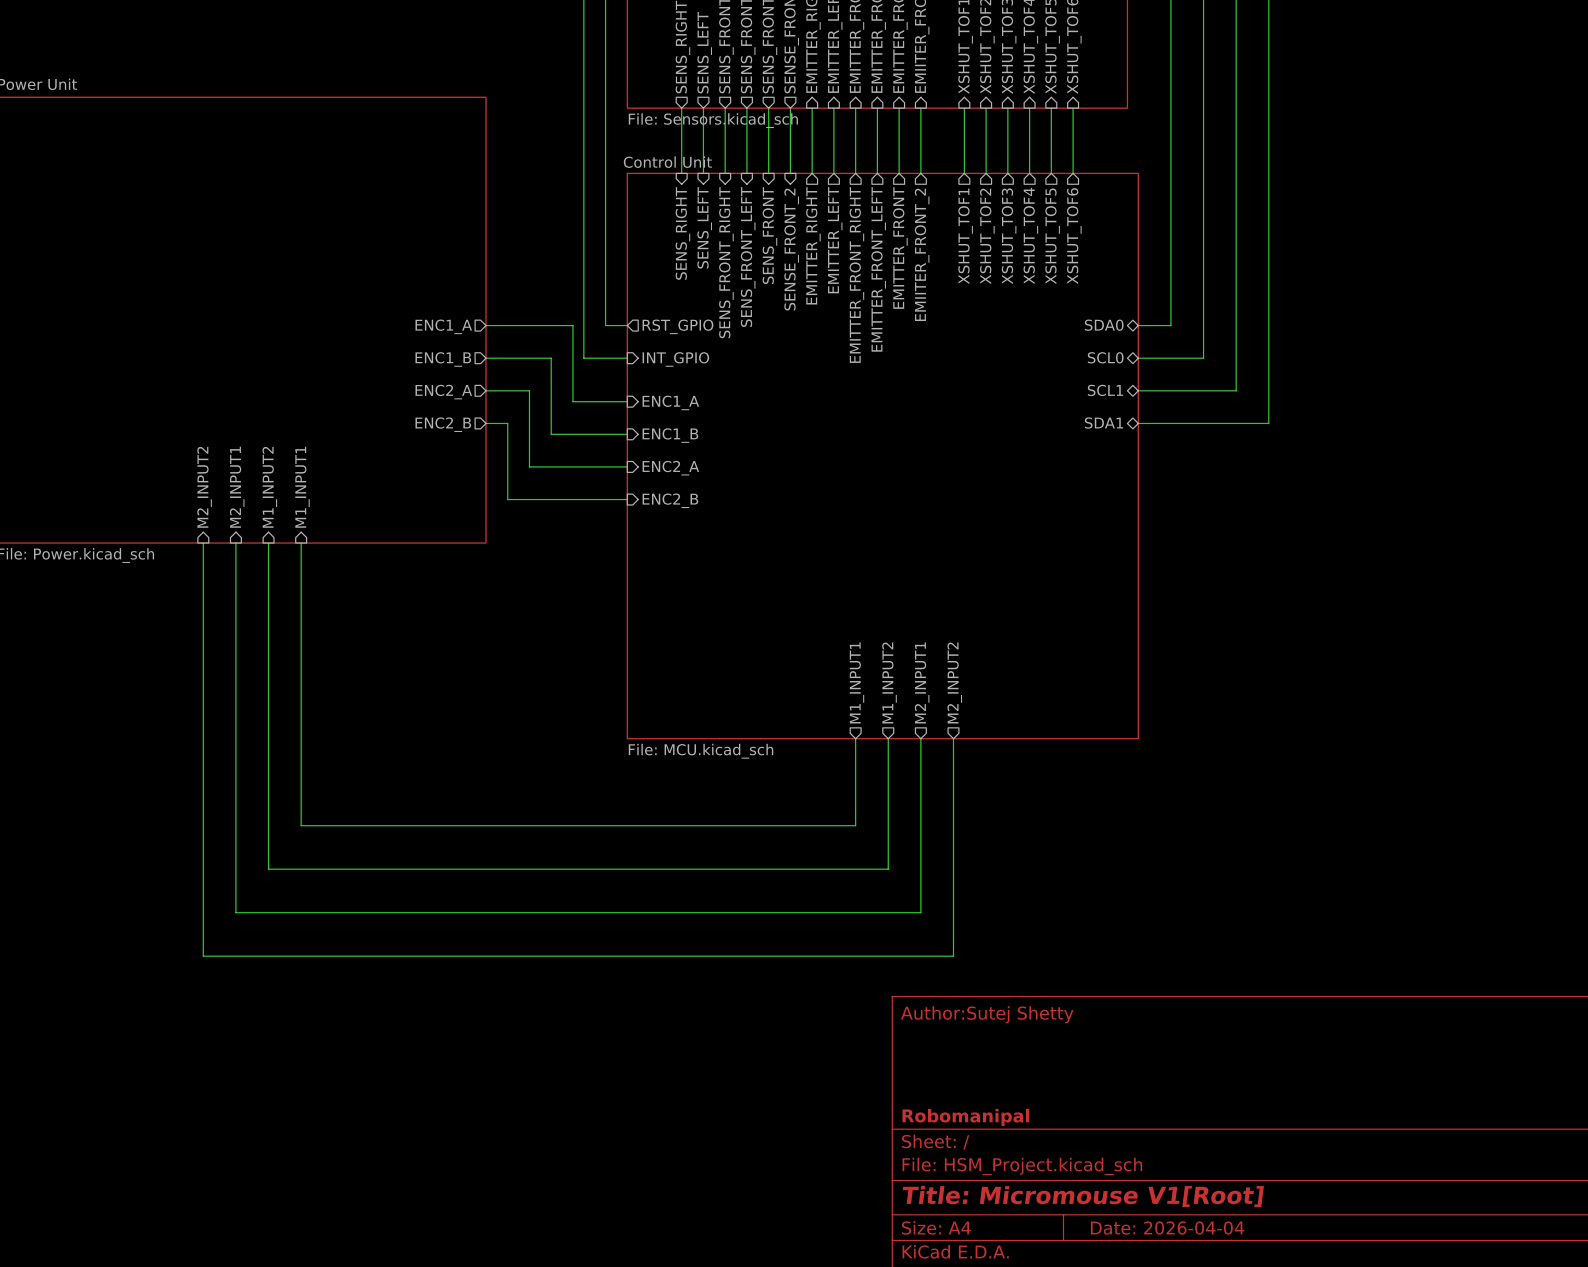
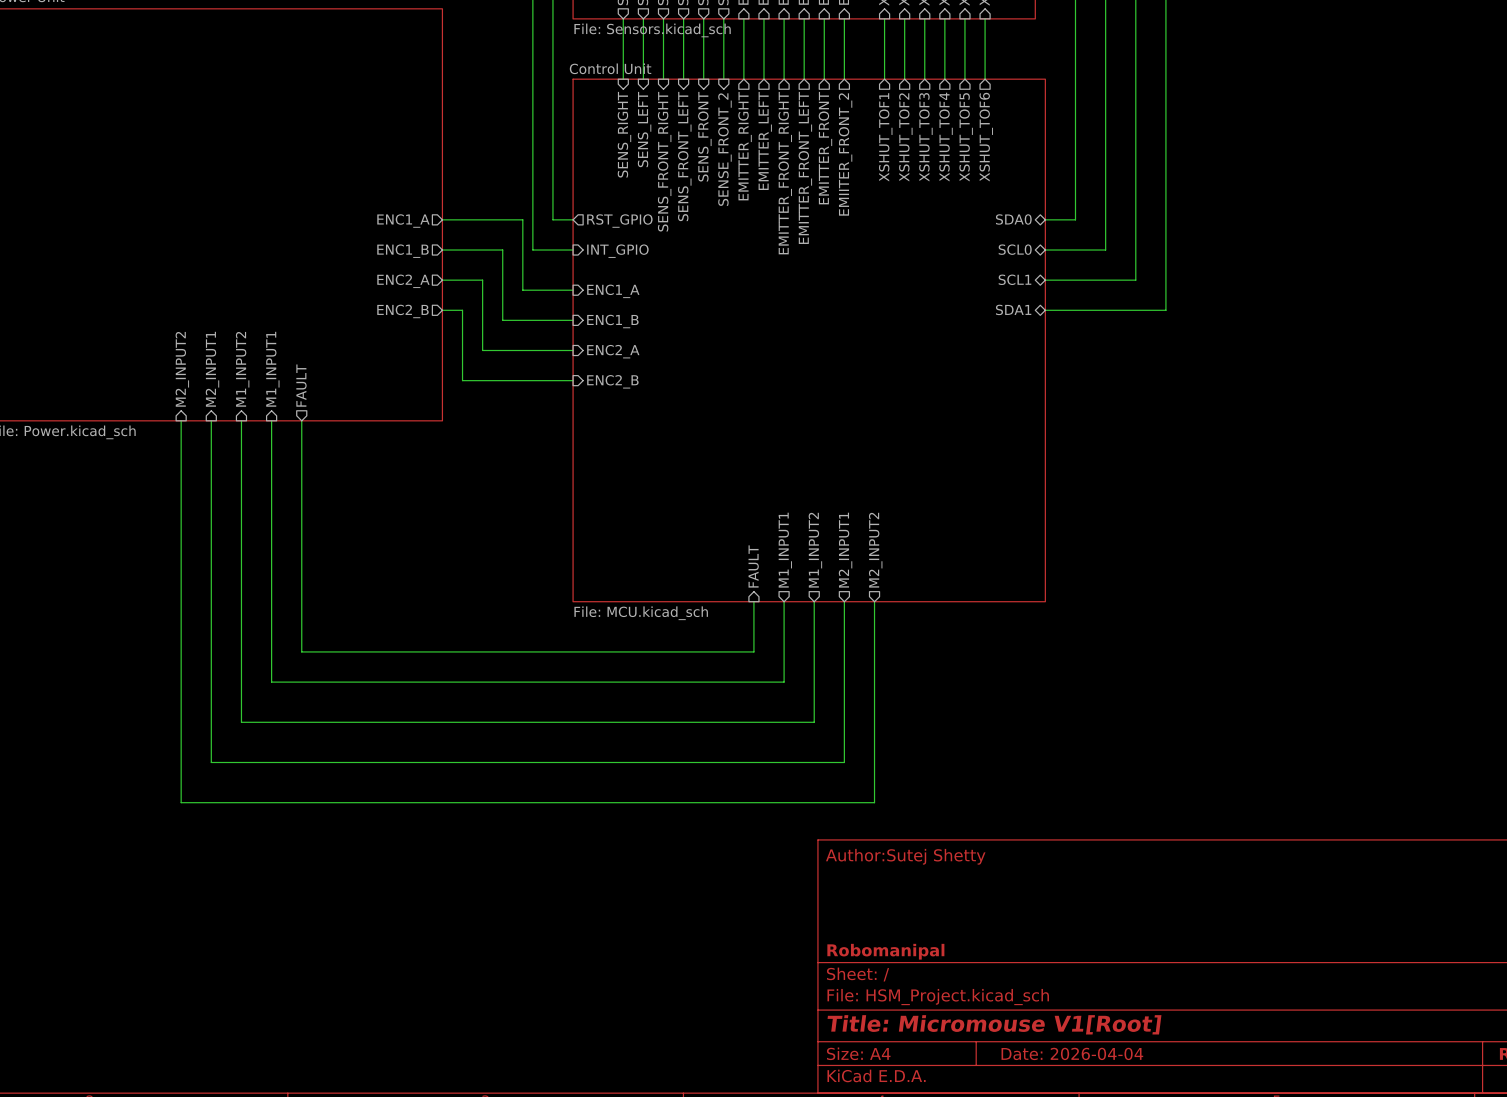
sheet pin: none -> FAULT (301, 385)
wire: none -> (301, 420) (301, 651) (753, 651) (753, 601)
sheet pin: none -> FAULT (753, 566)

